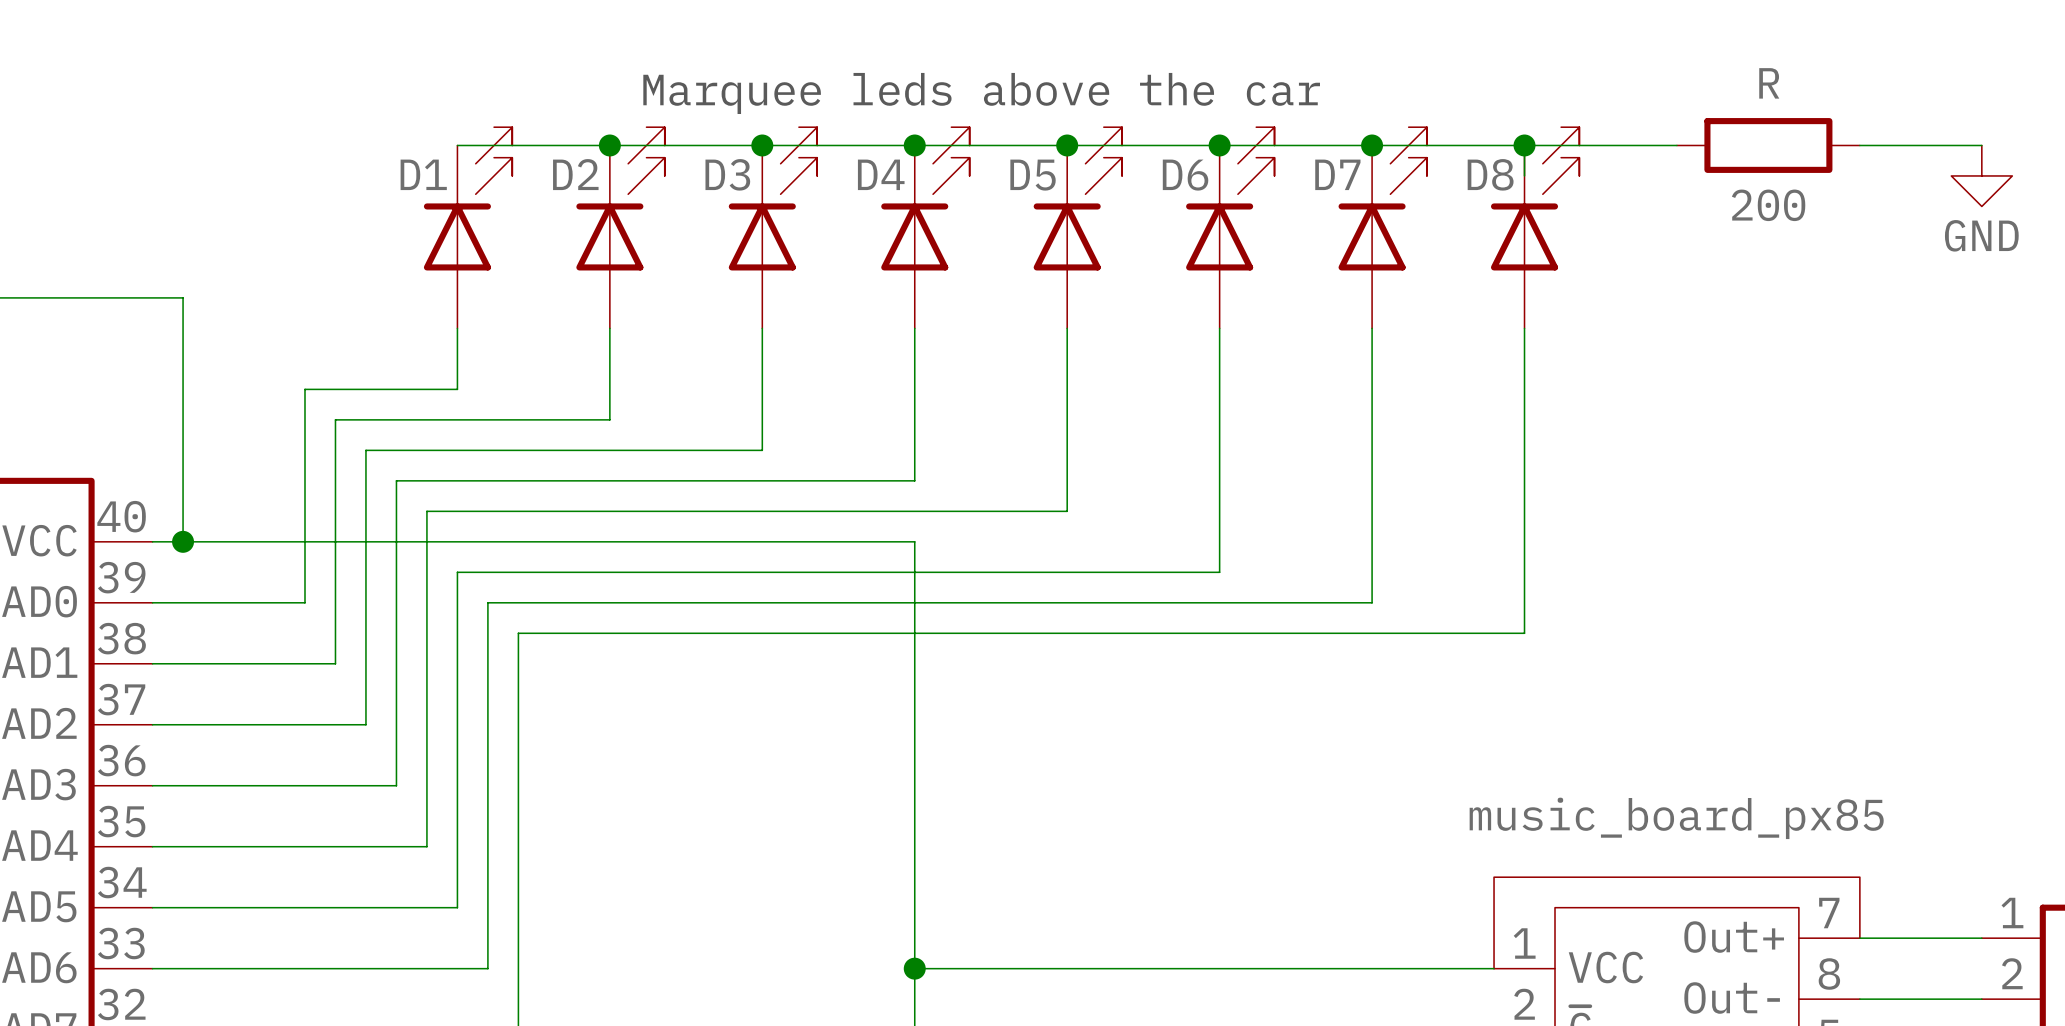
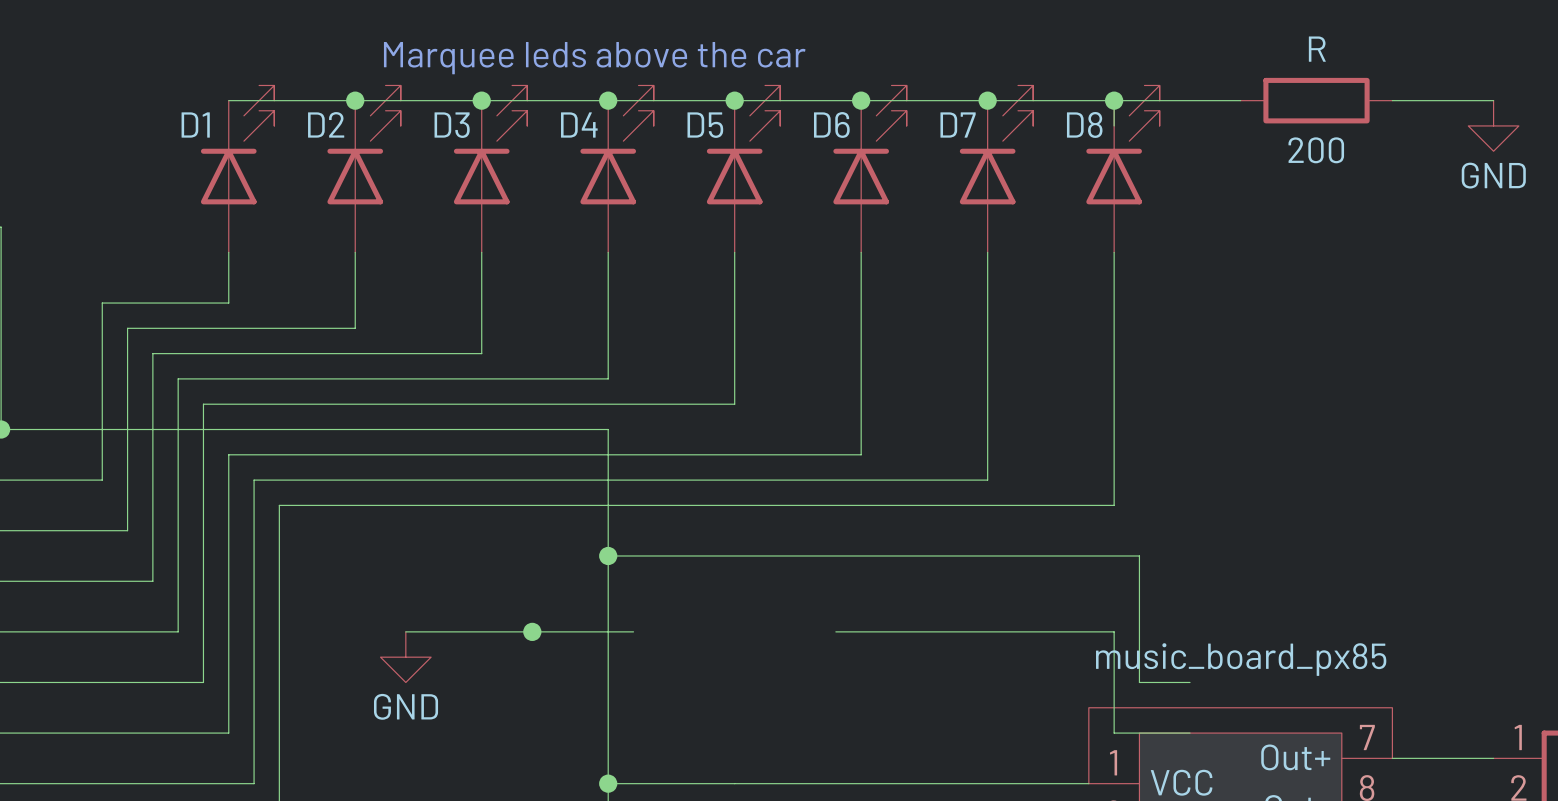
wire: none -> (608, 555) (1139, 555) (1139, 682) (1190, 682)
junction: none -> (608, 555)
wire: none -> (405, 631) (633, 631)
junction: none -> (532, 631)
wire: none -> (835, 631) (1114, 631) (1114, 733) (1190, 733)
power symbol: none -> GND (405, 657)

